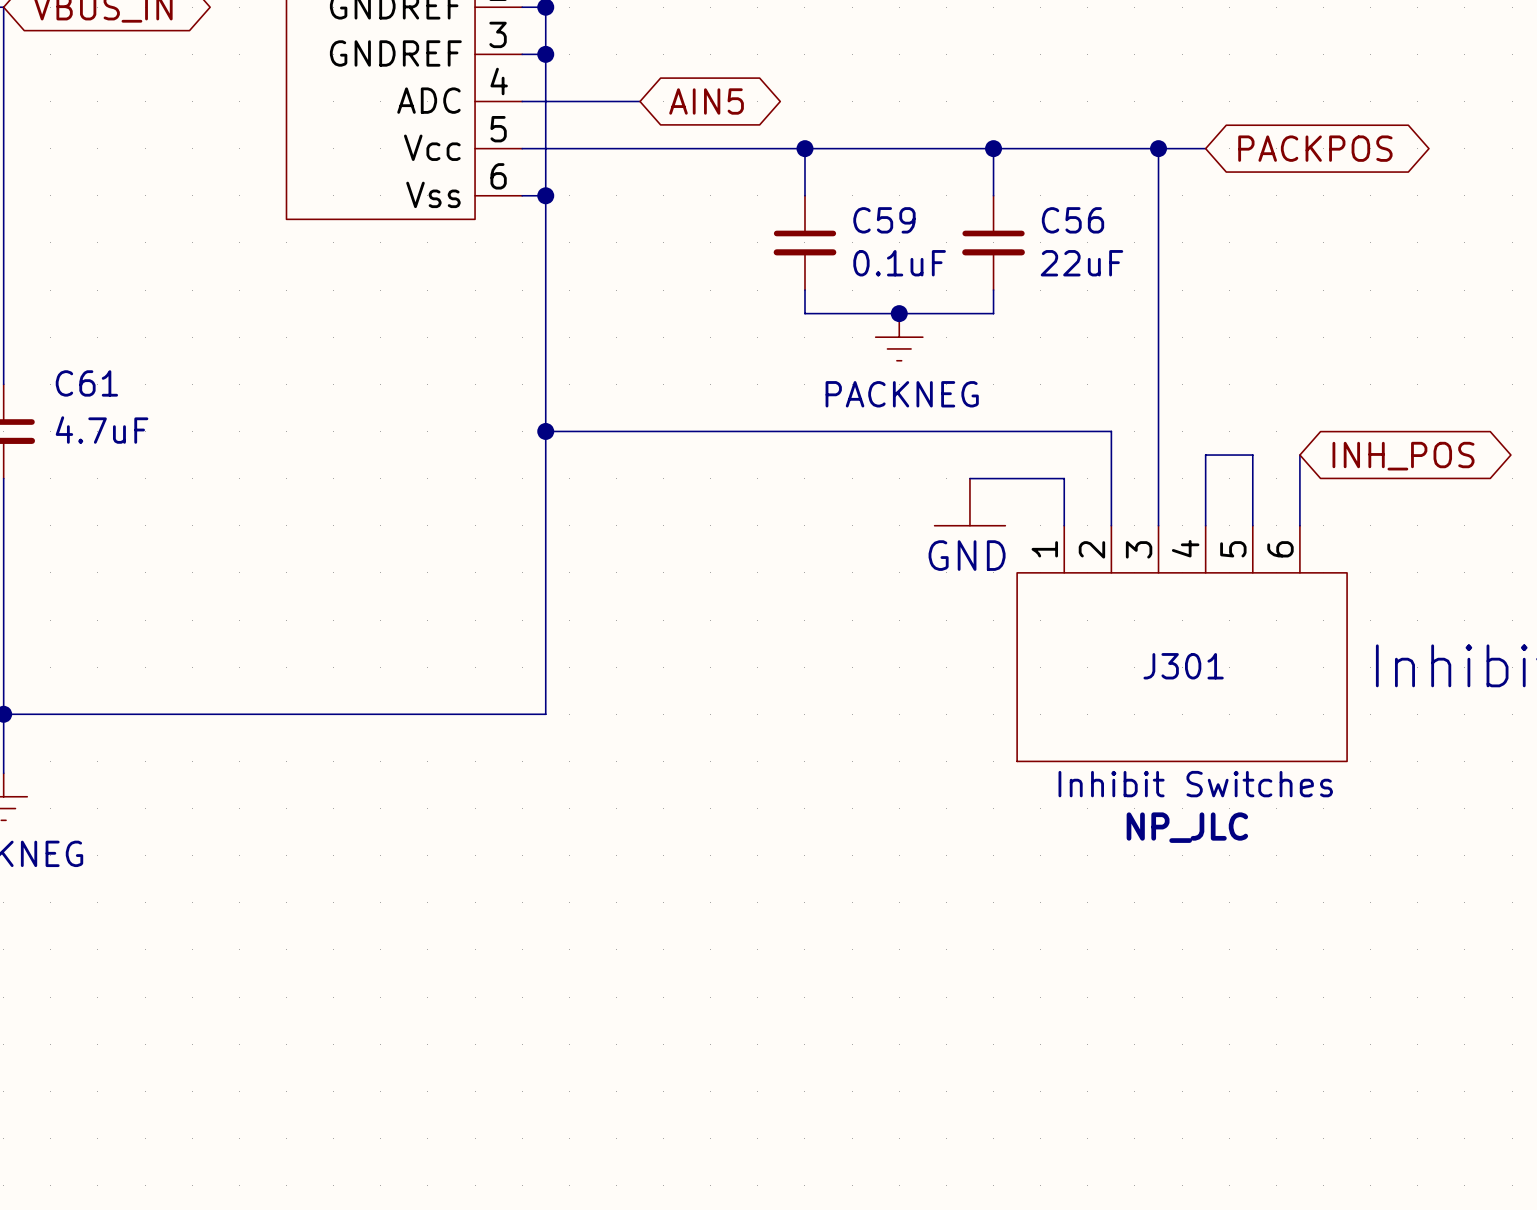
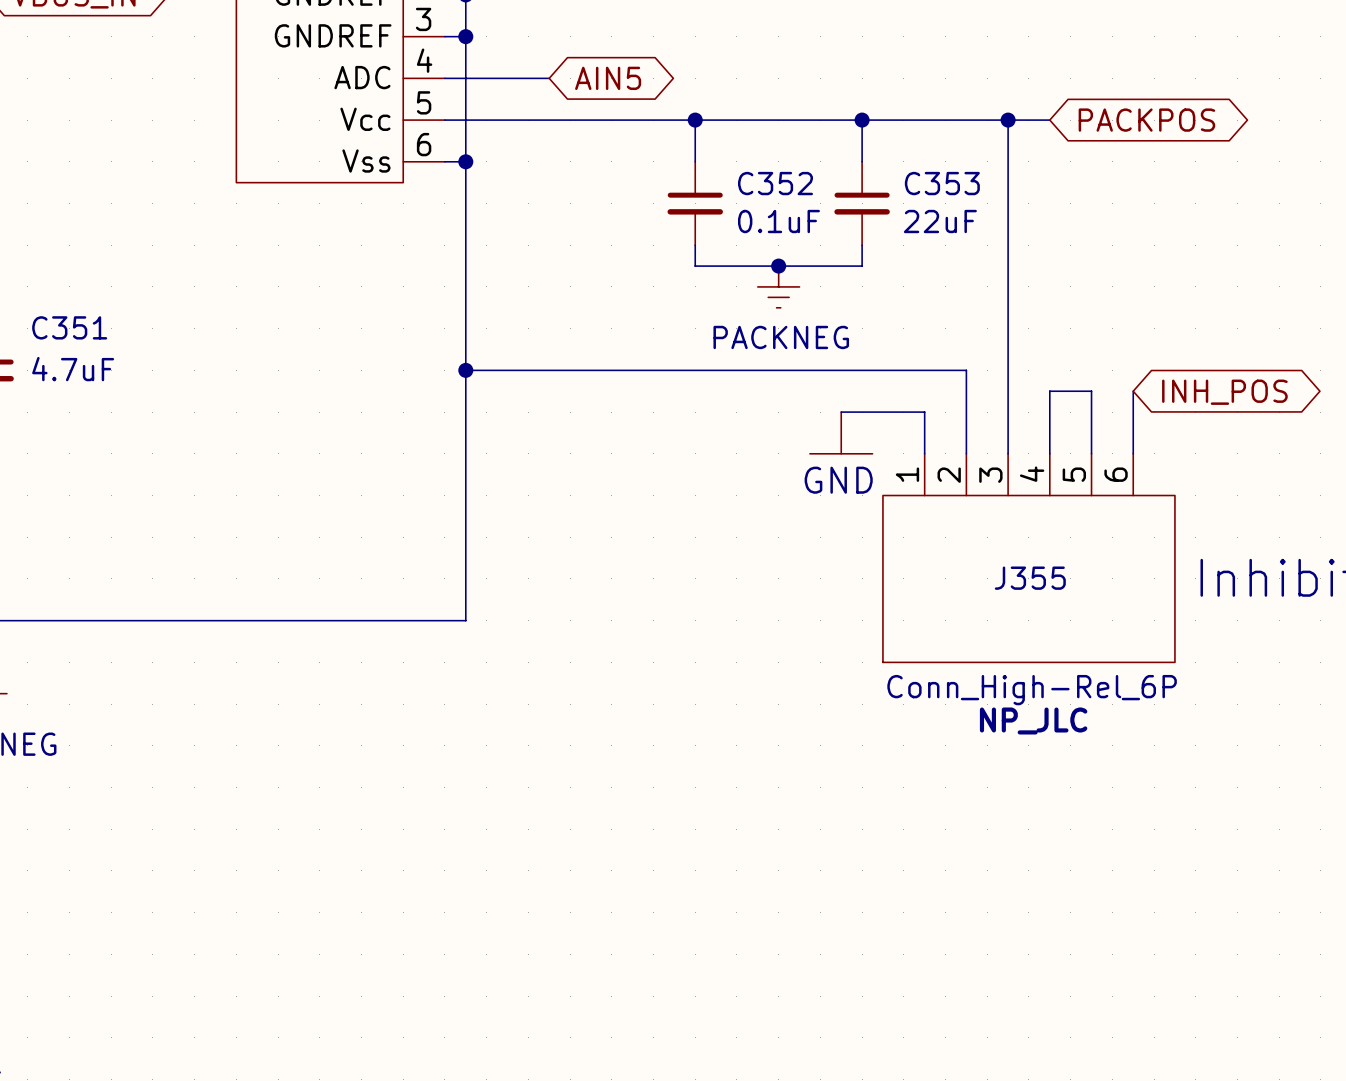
C59 name: C59 (884, 220) -> C352 (775, 183)
C56 name: C56 (1073, 220) -> C353 (942, 183)
C61 name: C61 (86, 383) -> C351 (69, 327)
J301 name: J301 (1183, 666) -> J355 (1030, 578)
J301 value: Inhibit Switches (1195, 784) -> Conn_High-Rel_6P (1032, 690)

